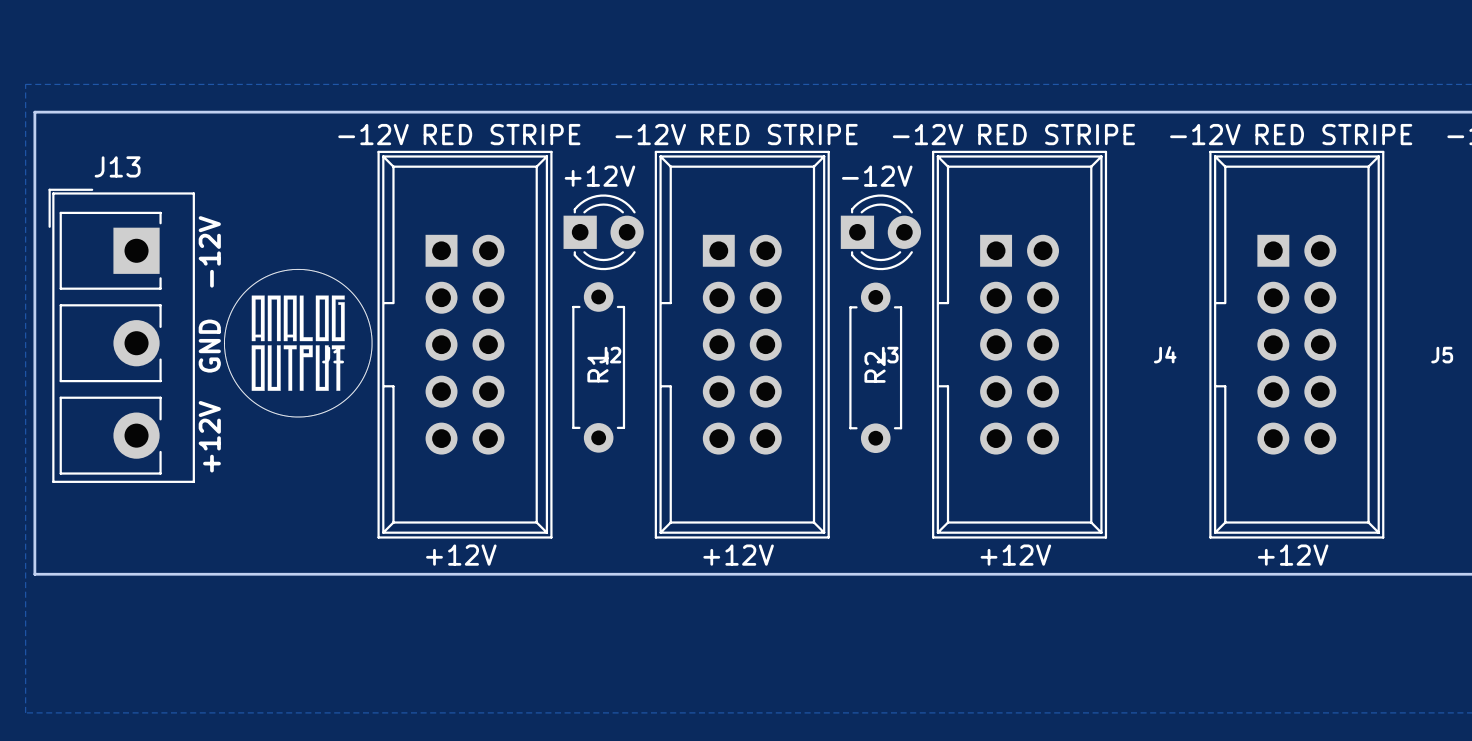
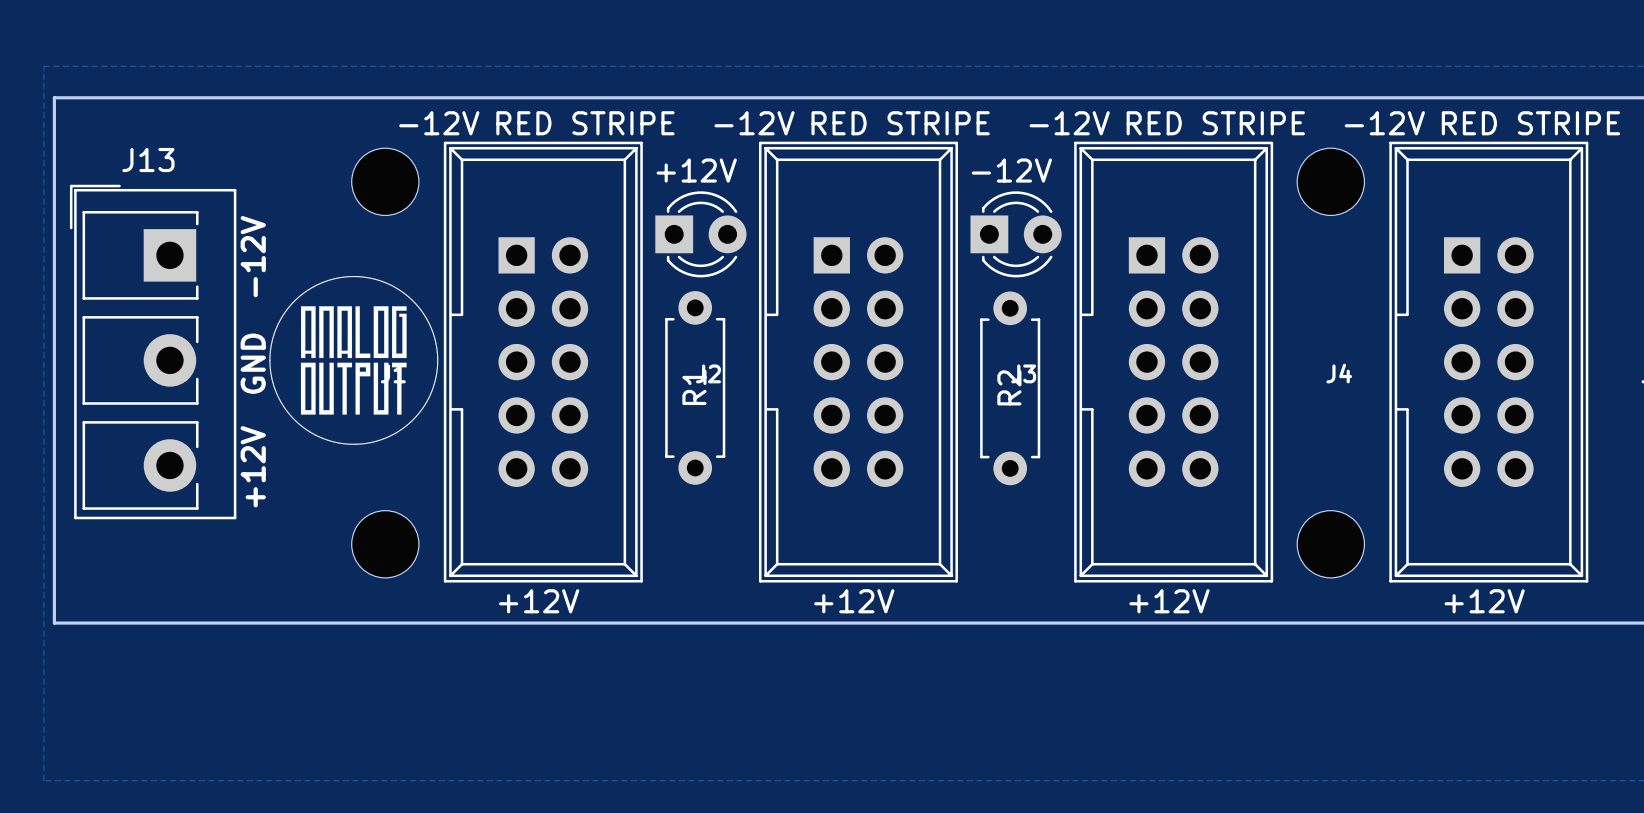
part: none -> (385, 181)
part: none -> (1330, 181)
part: none -> (385, 544)
part: none -> (1330, 544)

